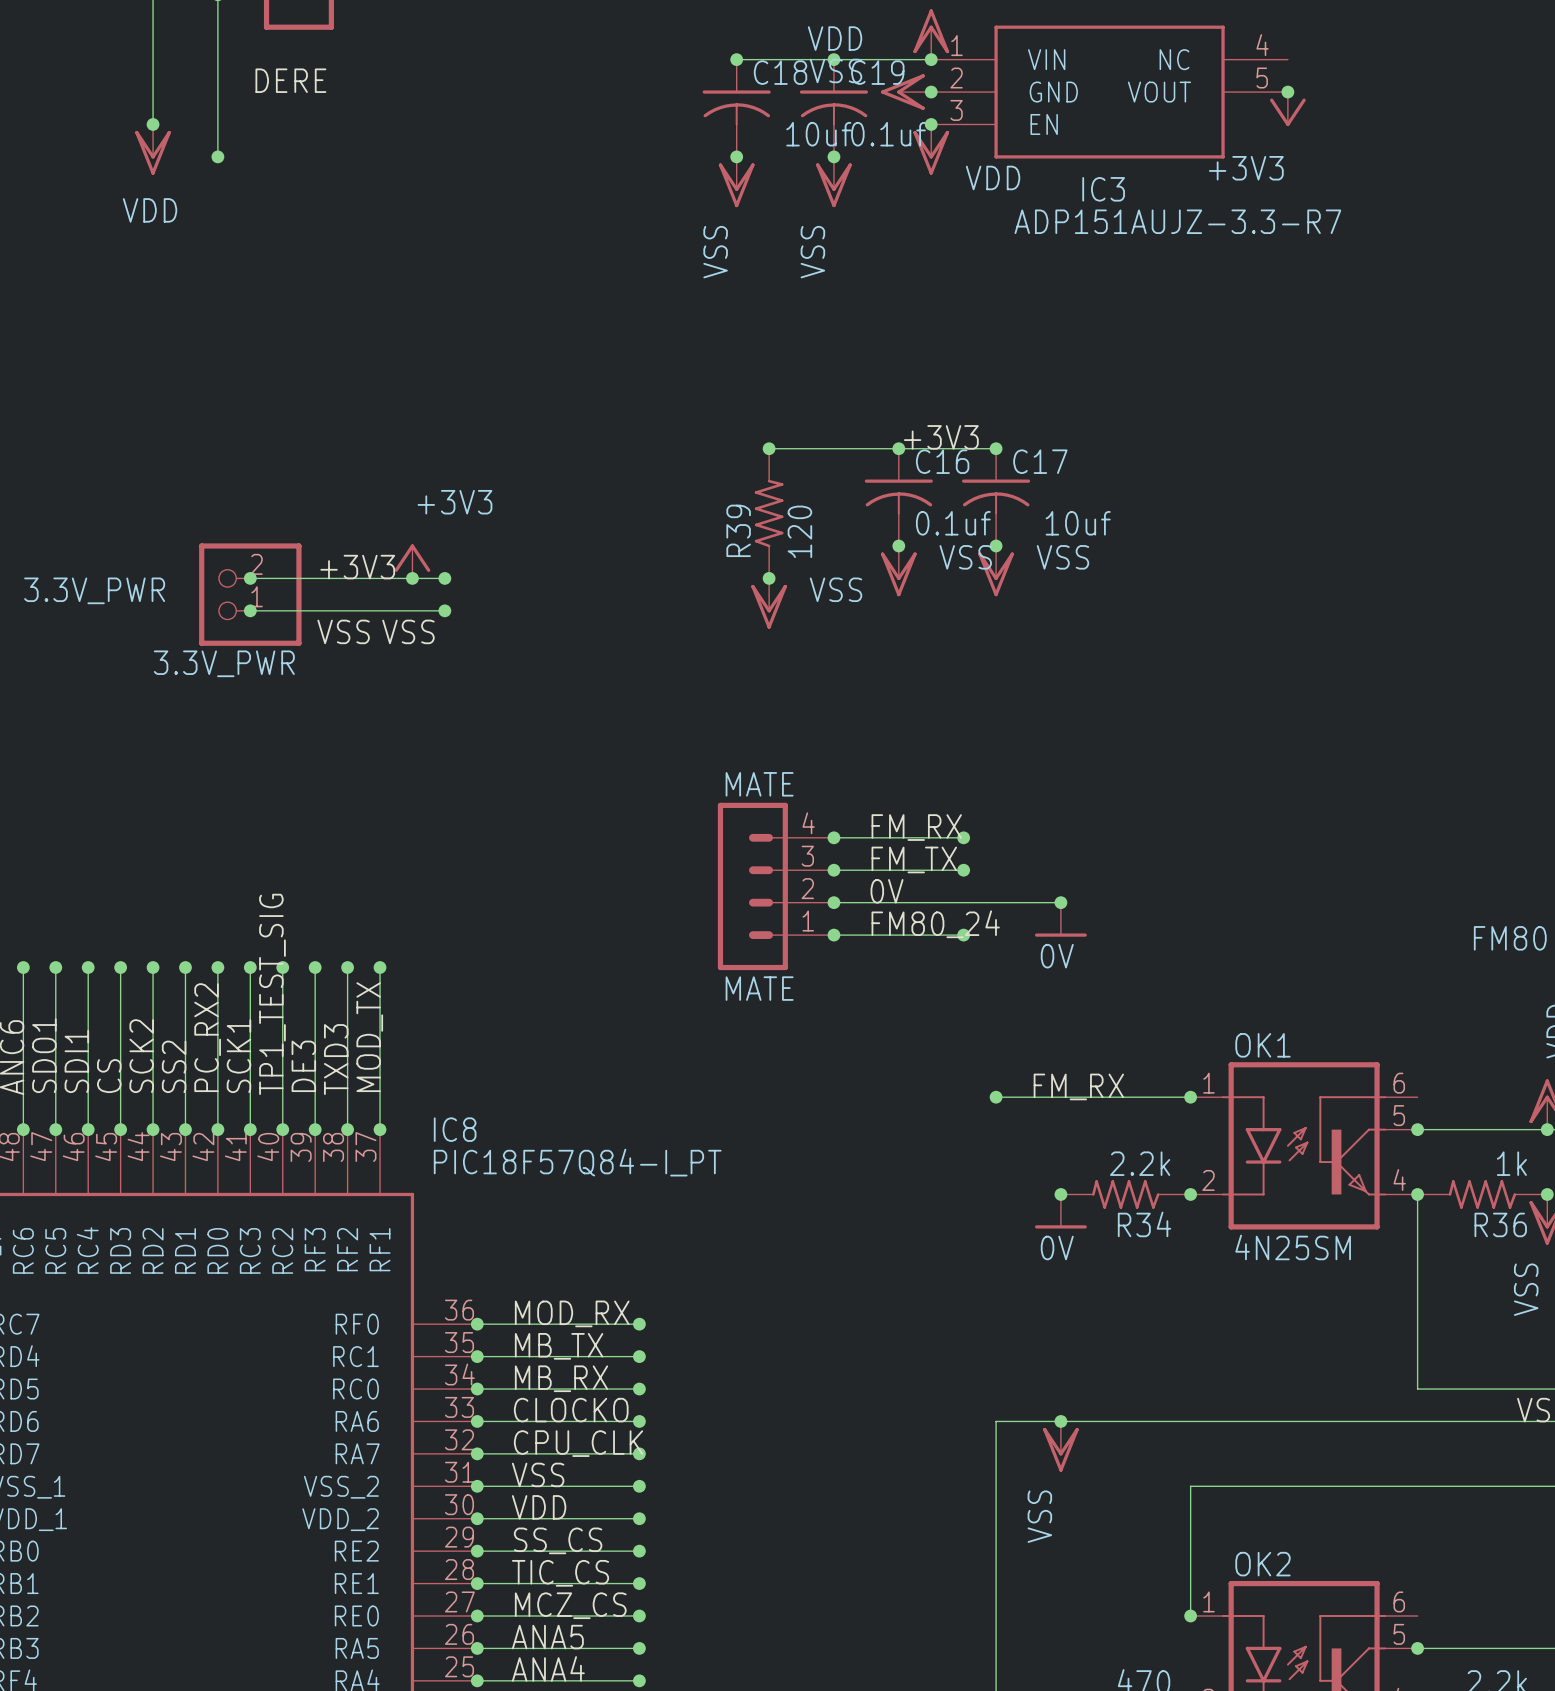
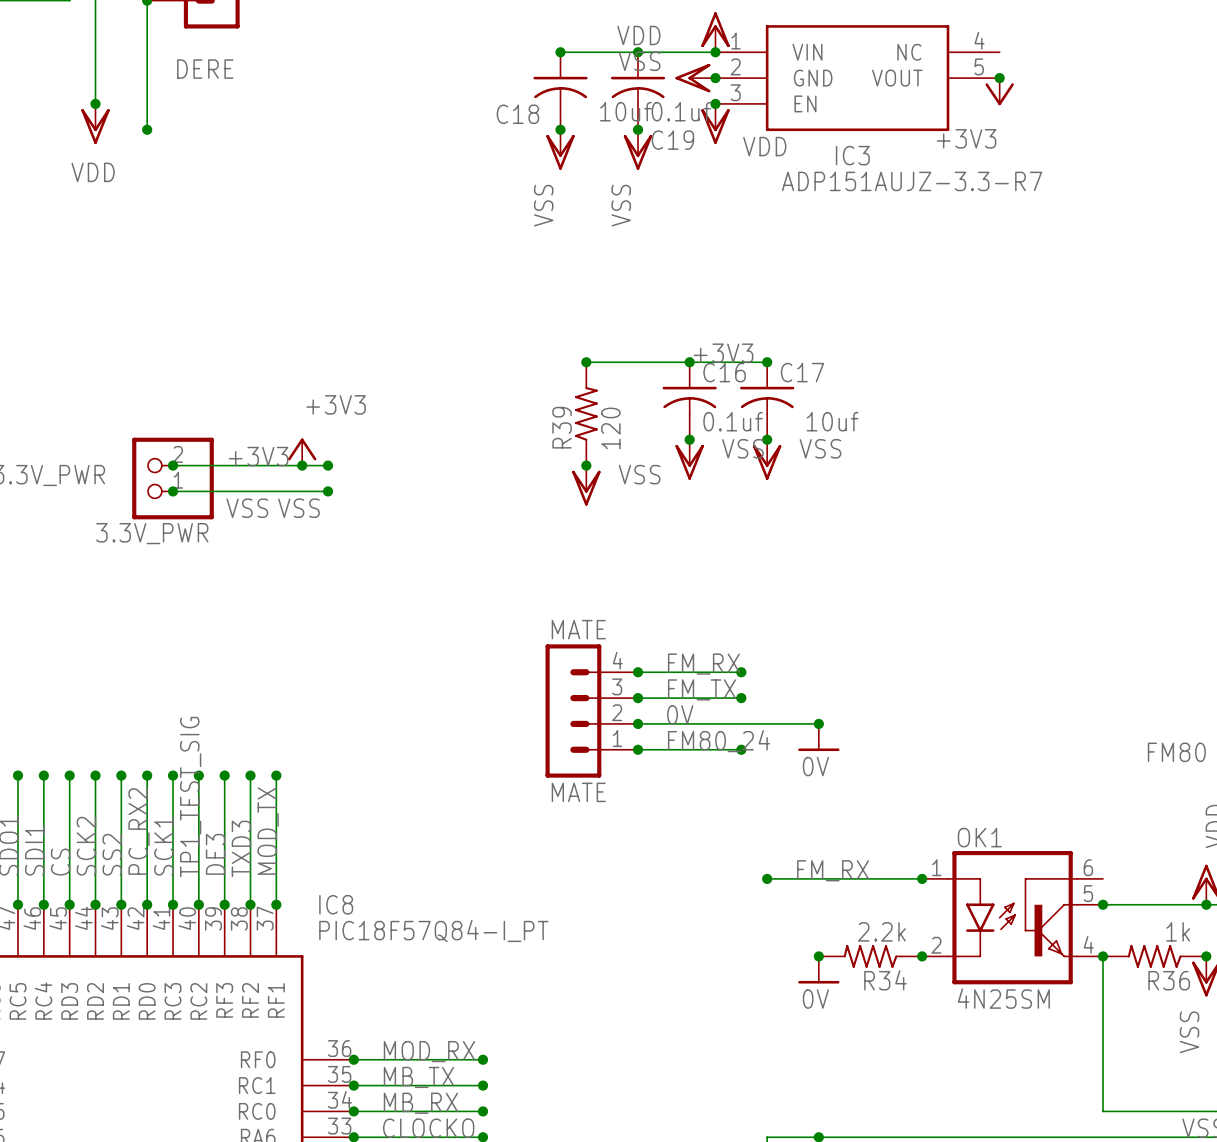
C18 name position: C18 (780, 72) -> C18 (517, 114)
C19 name position: C19 (877, 72) -> C19 (672, 140)

